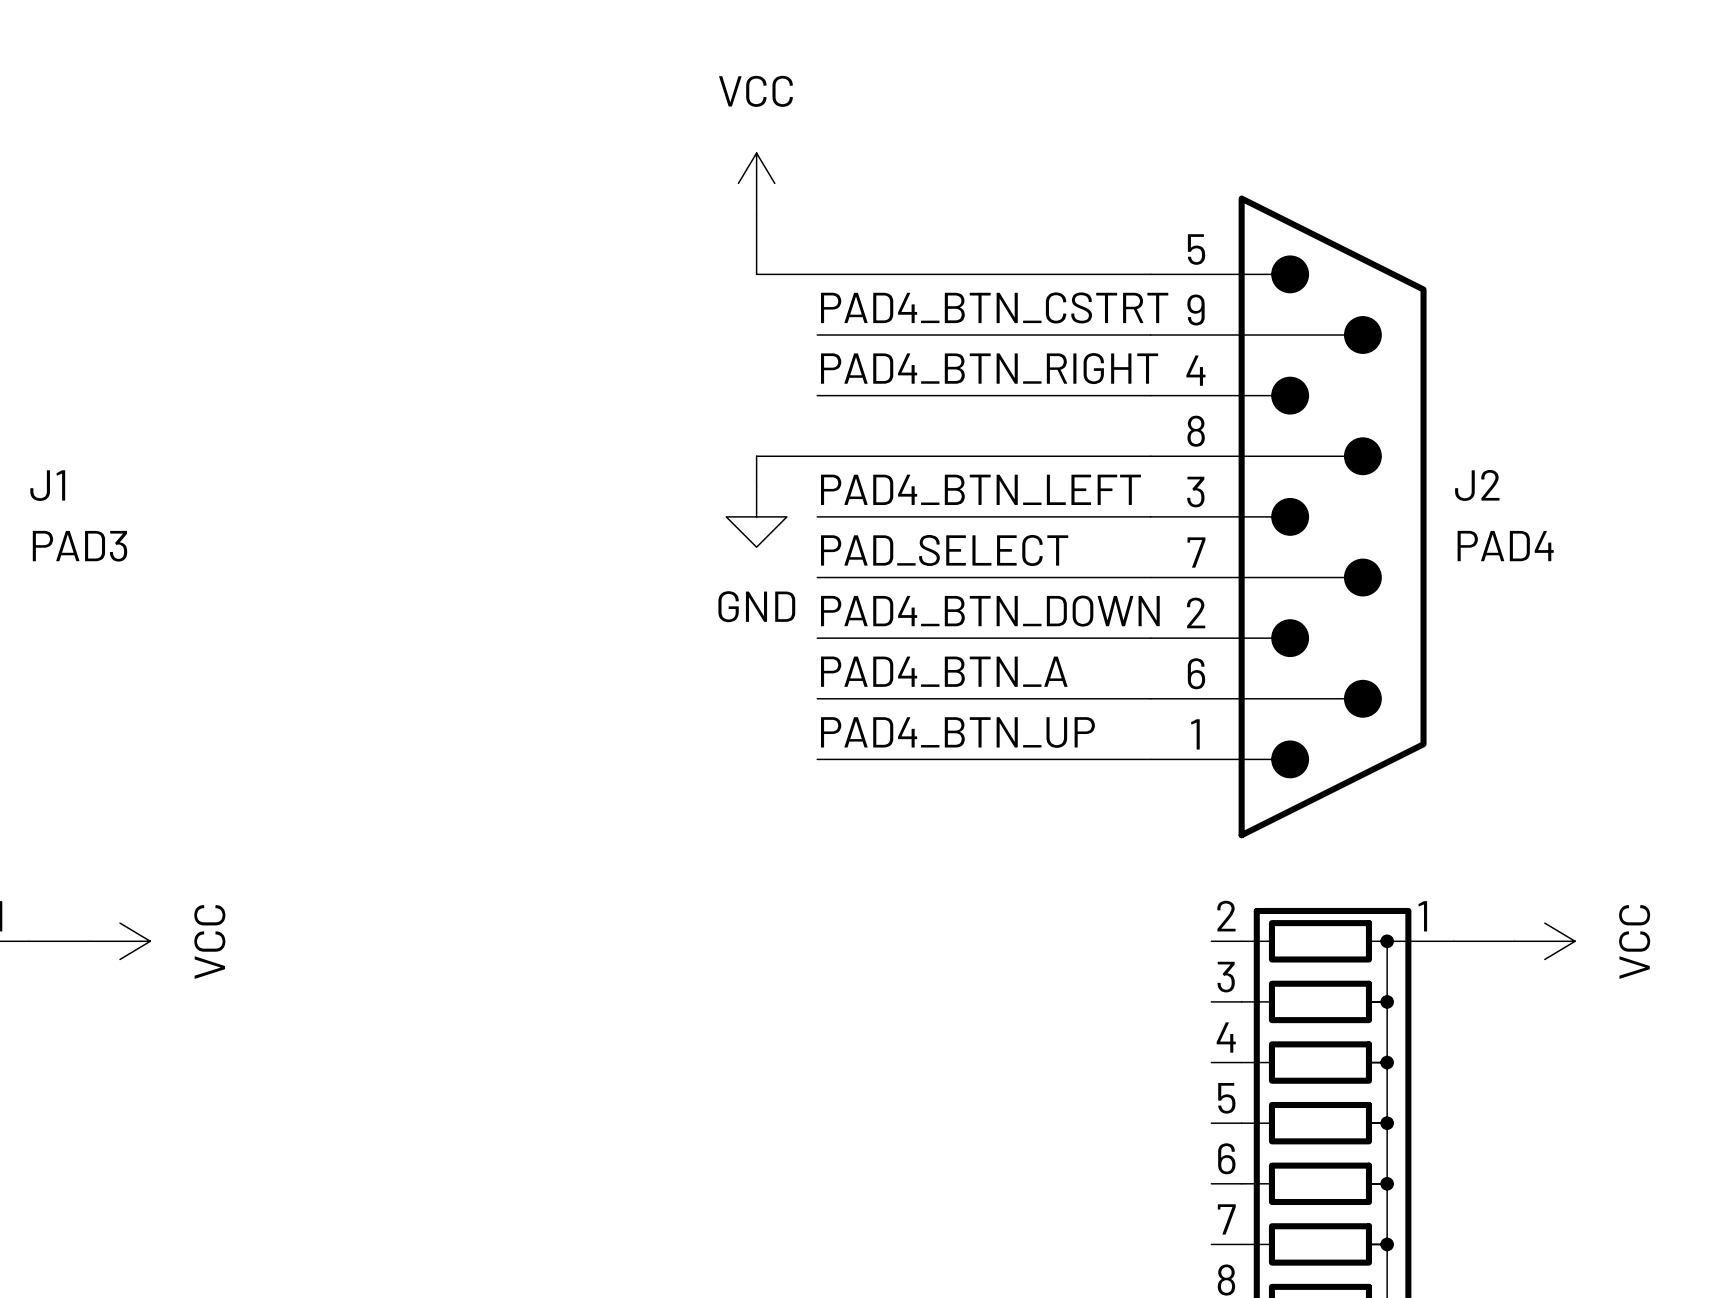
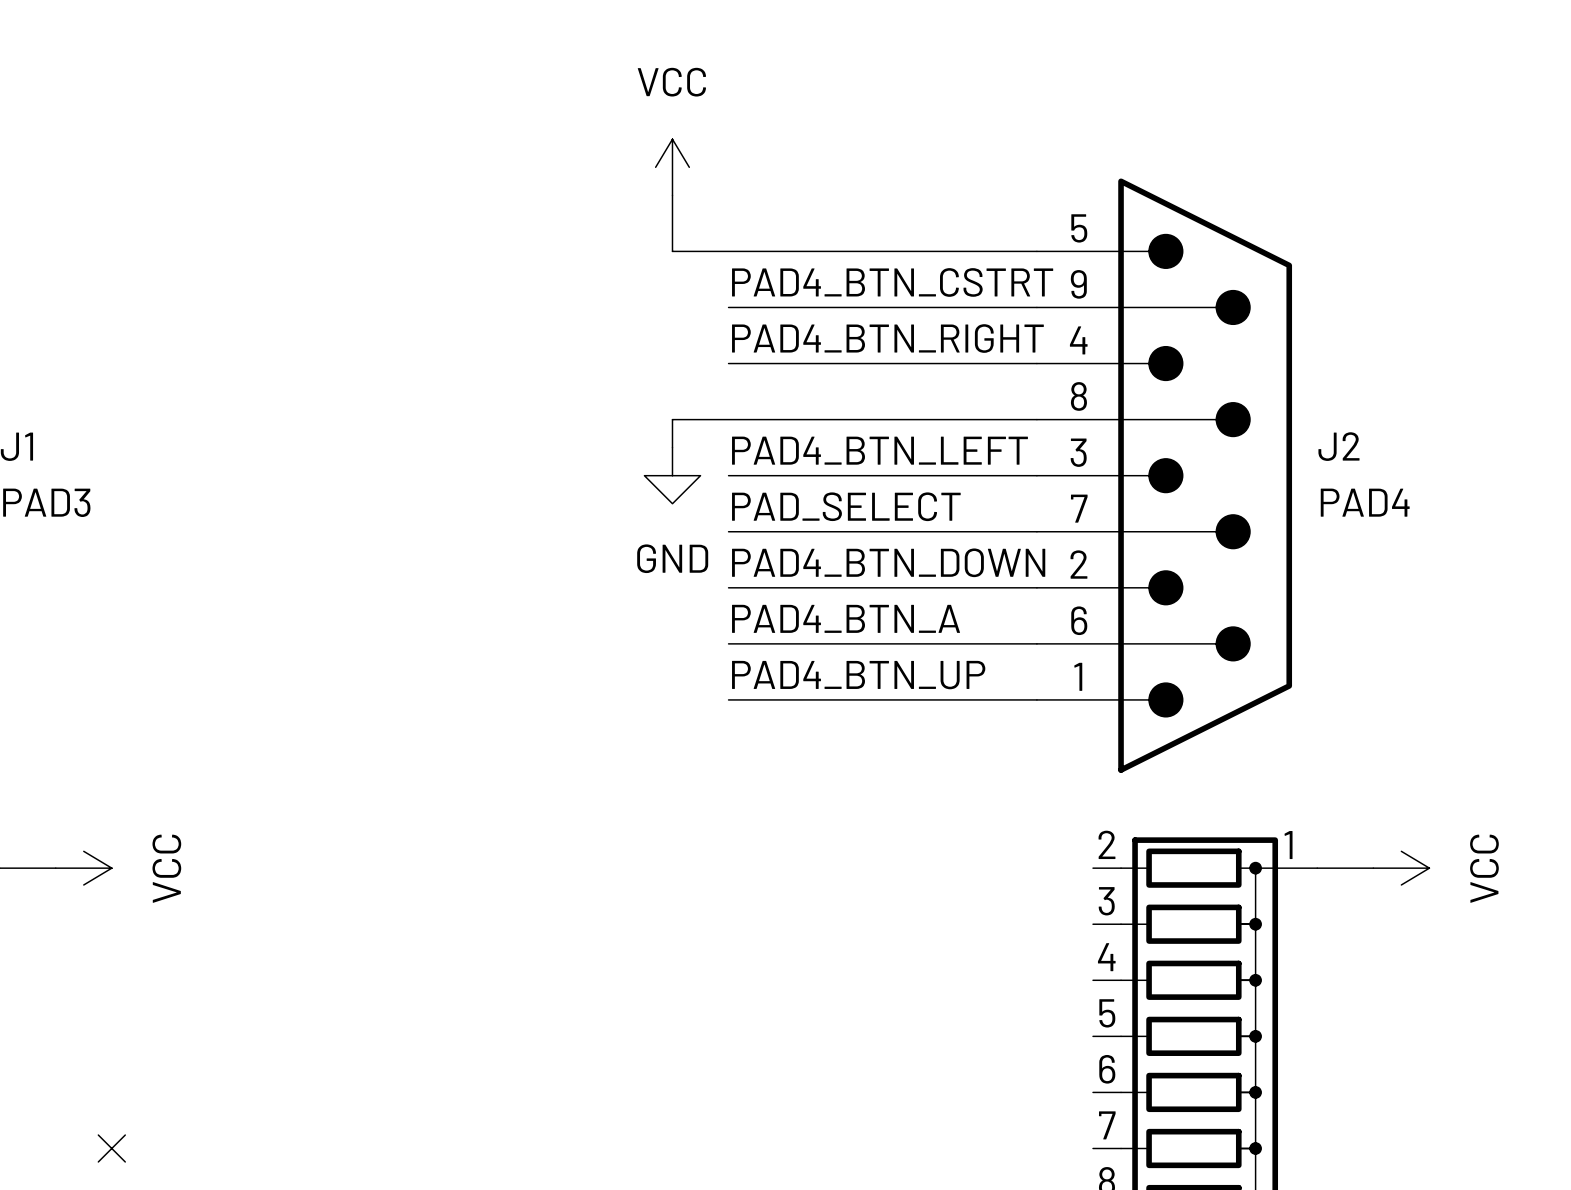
no-connect mark: none -> (111, 1148)

